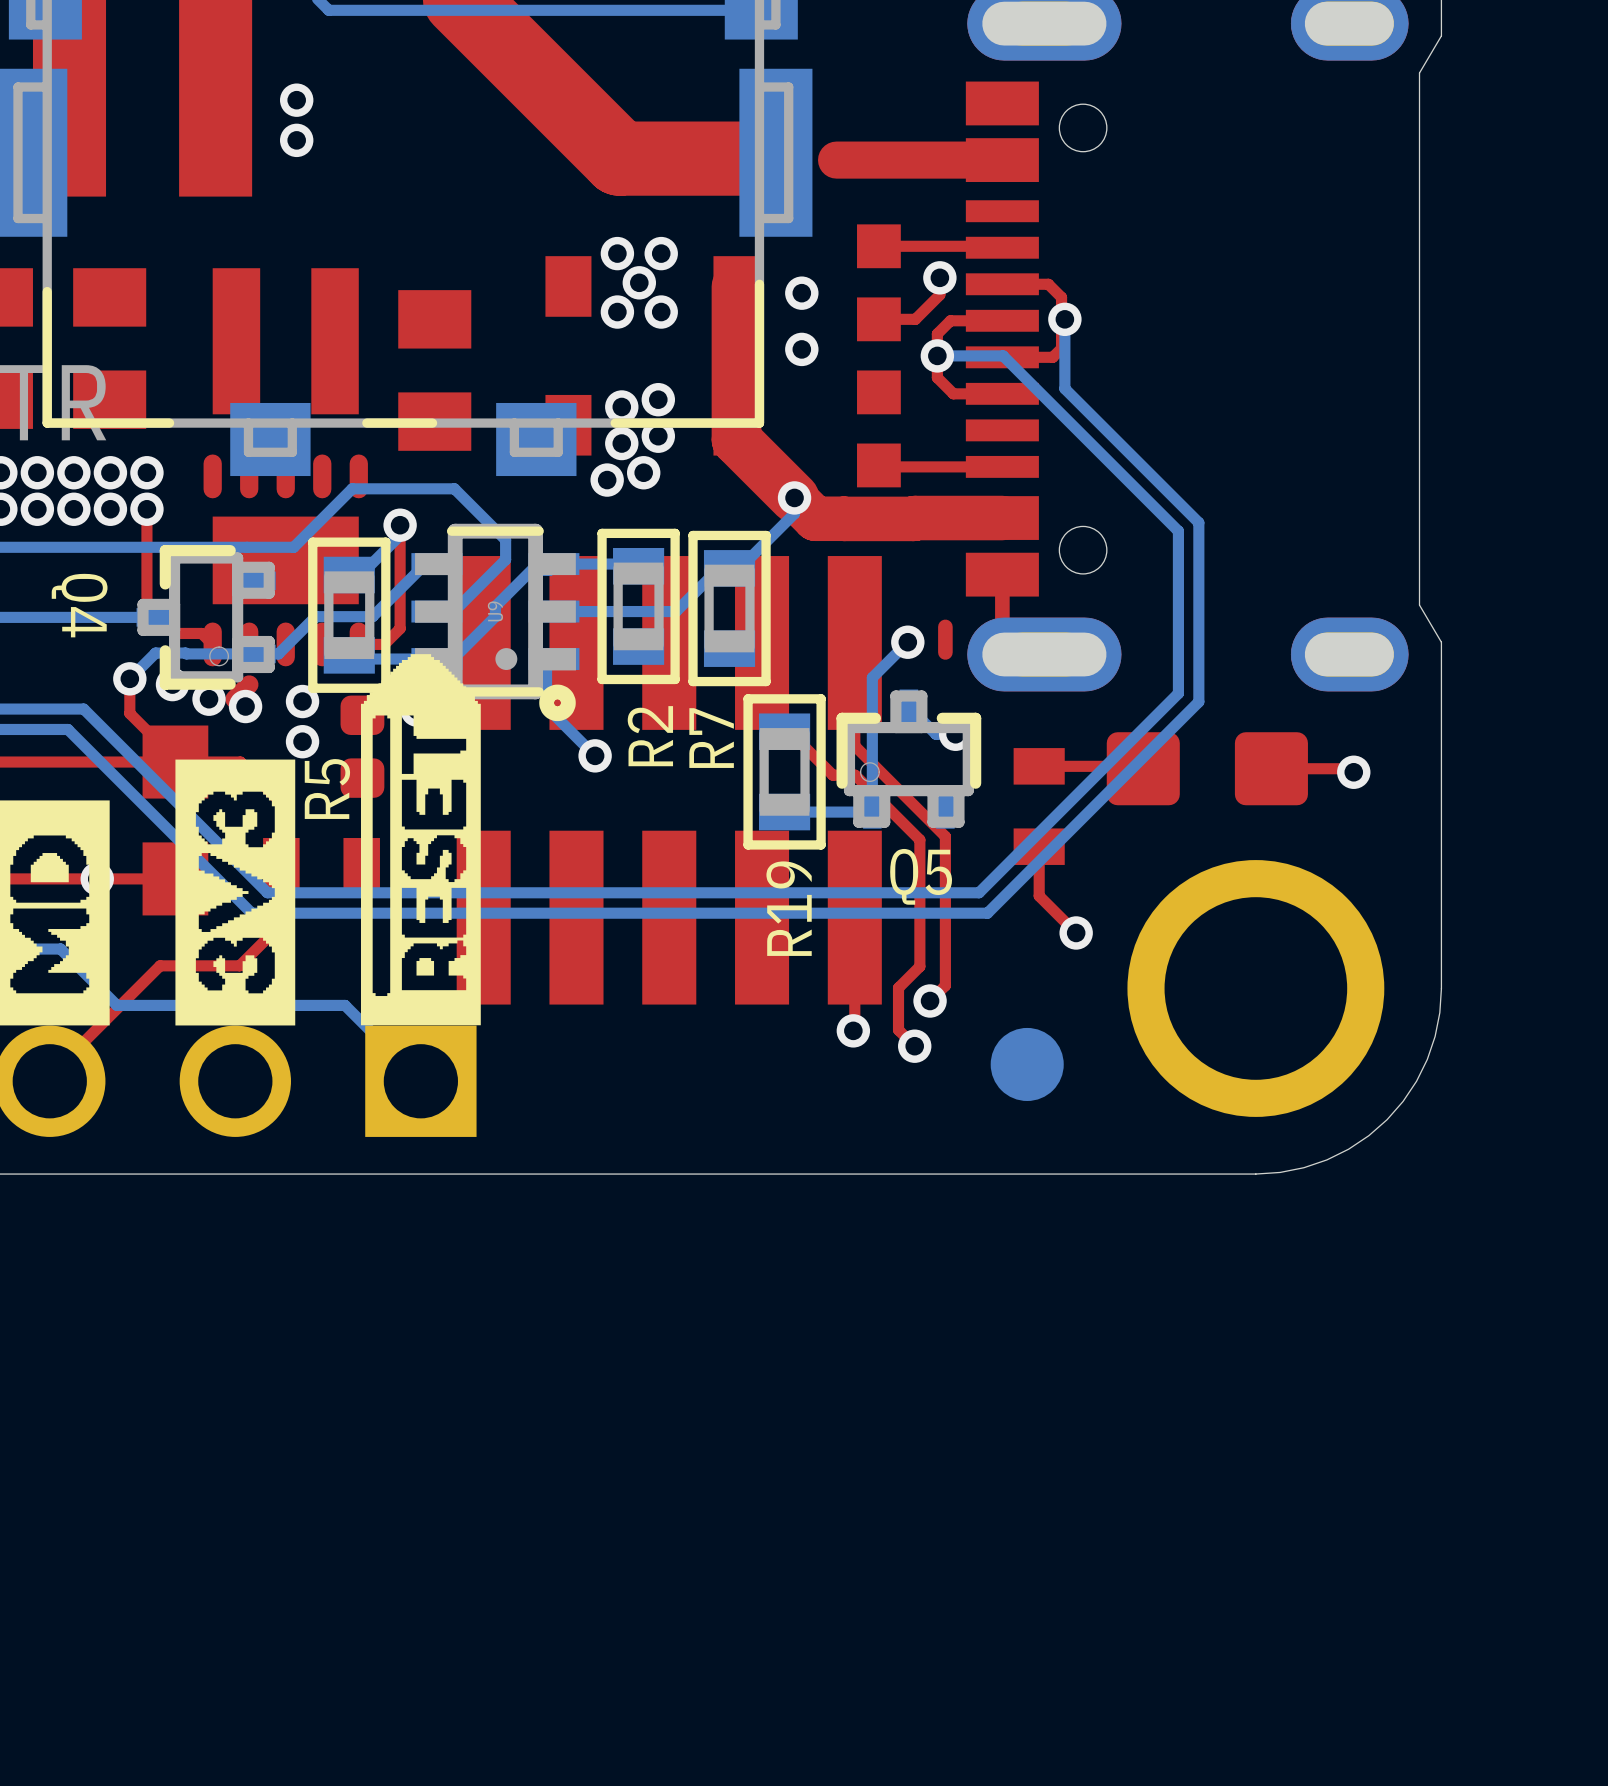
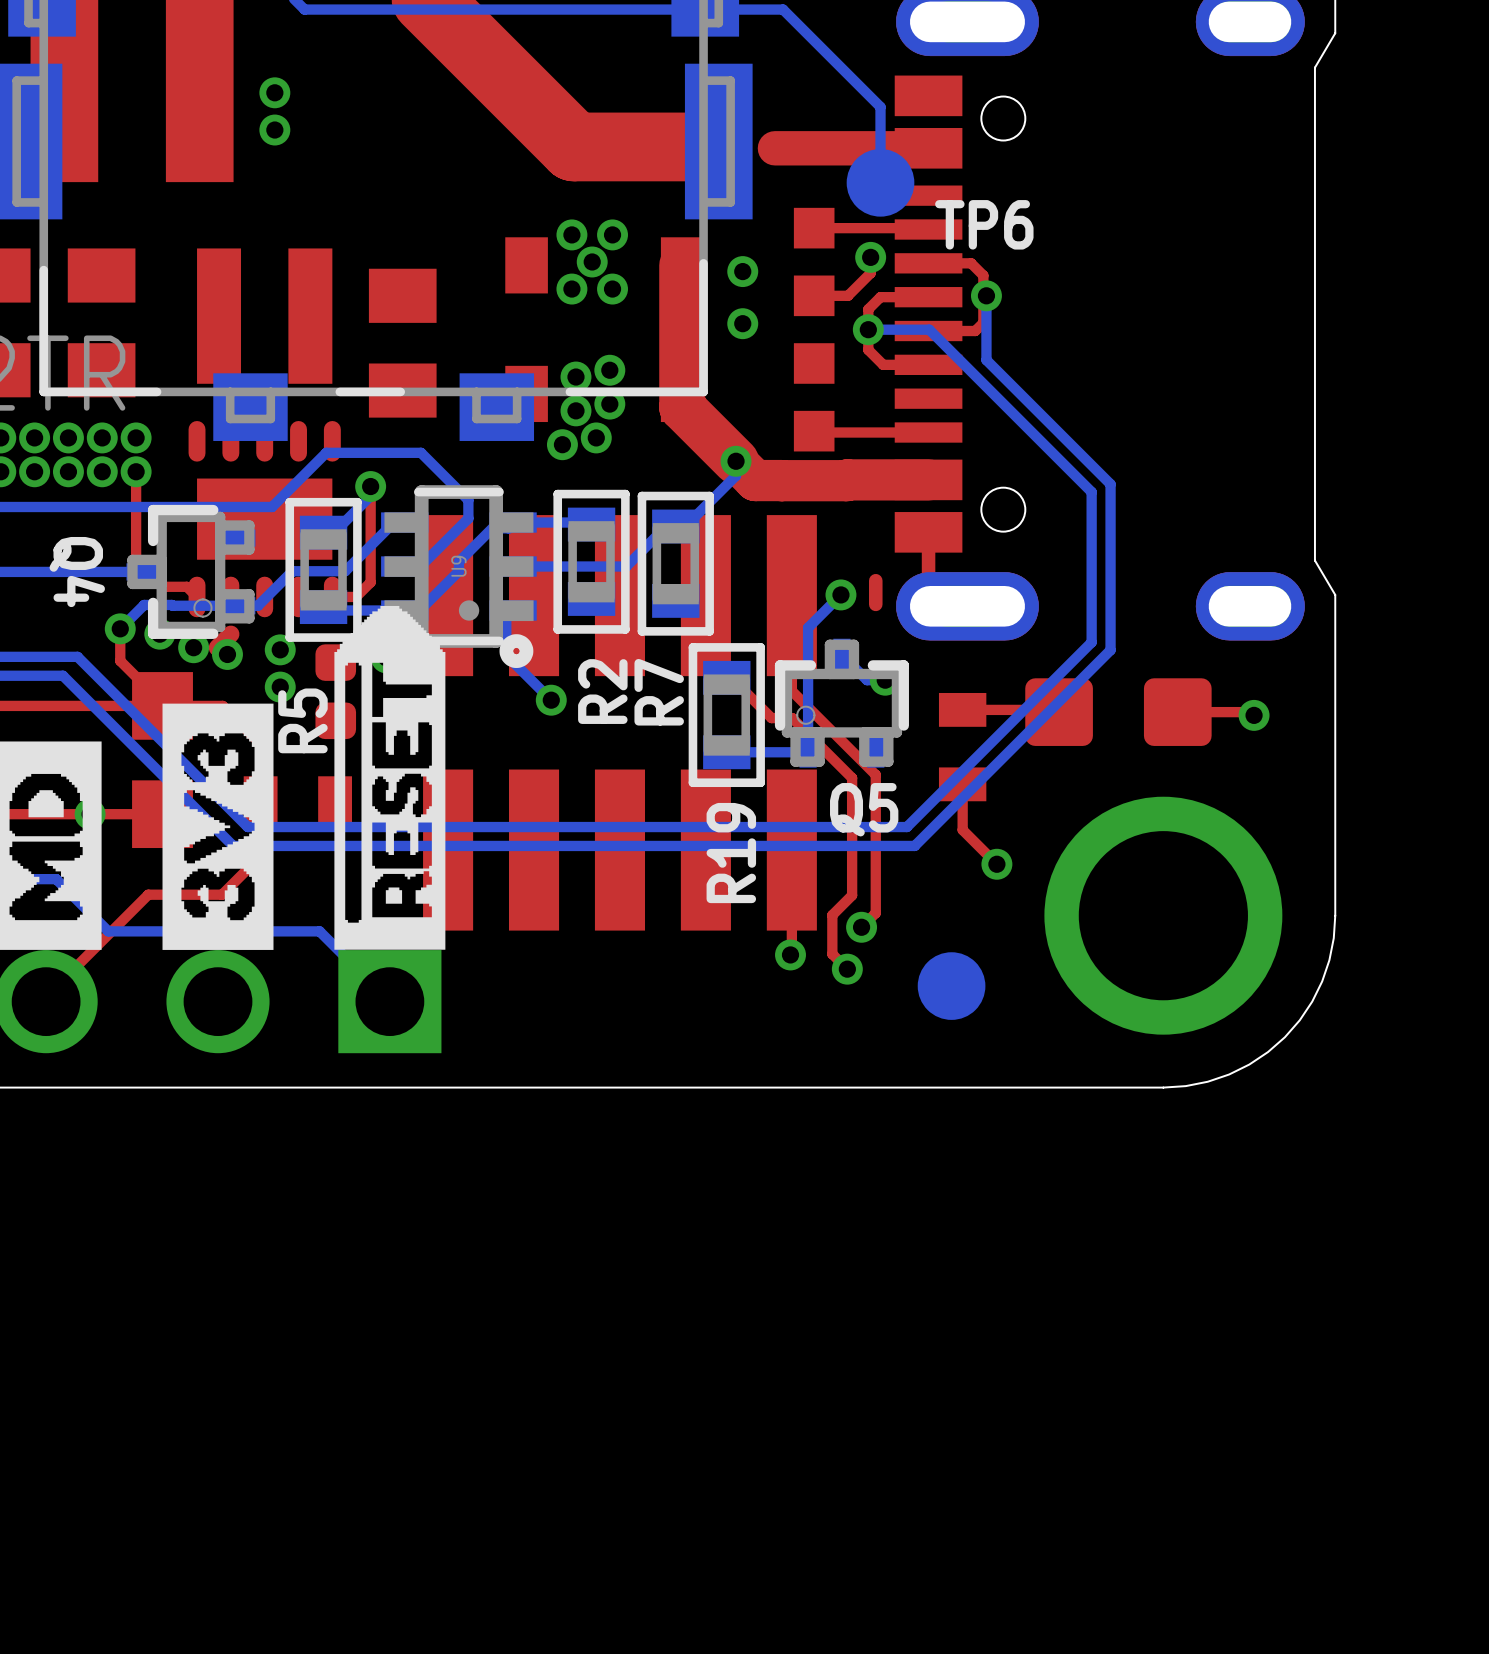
bottom track: none -> (705, 9) (783, 9) (880, 107) (880, 182)
TP6: none -> (880, 182)

